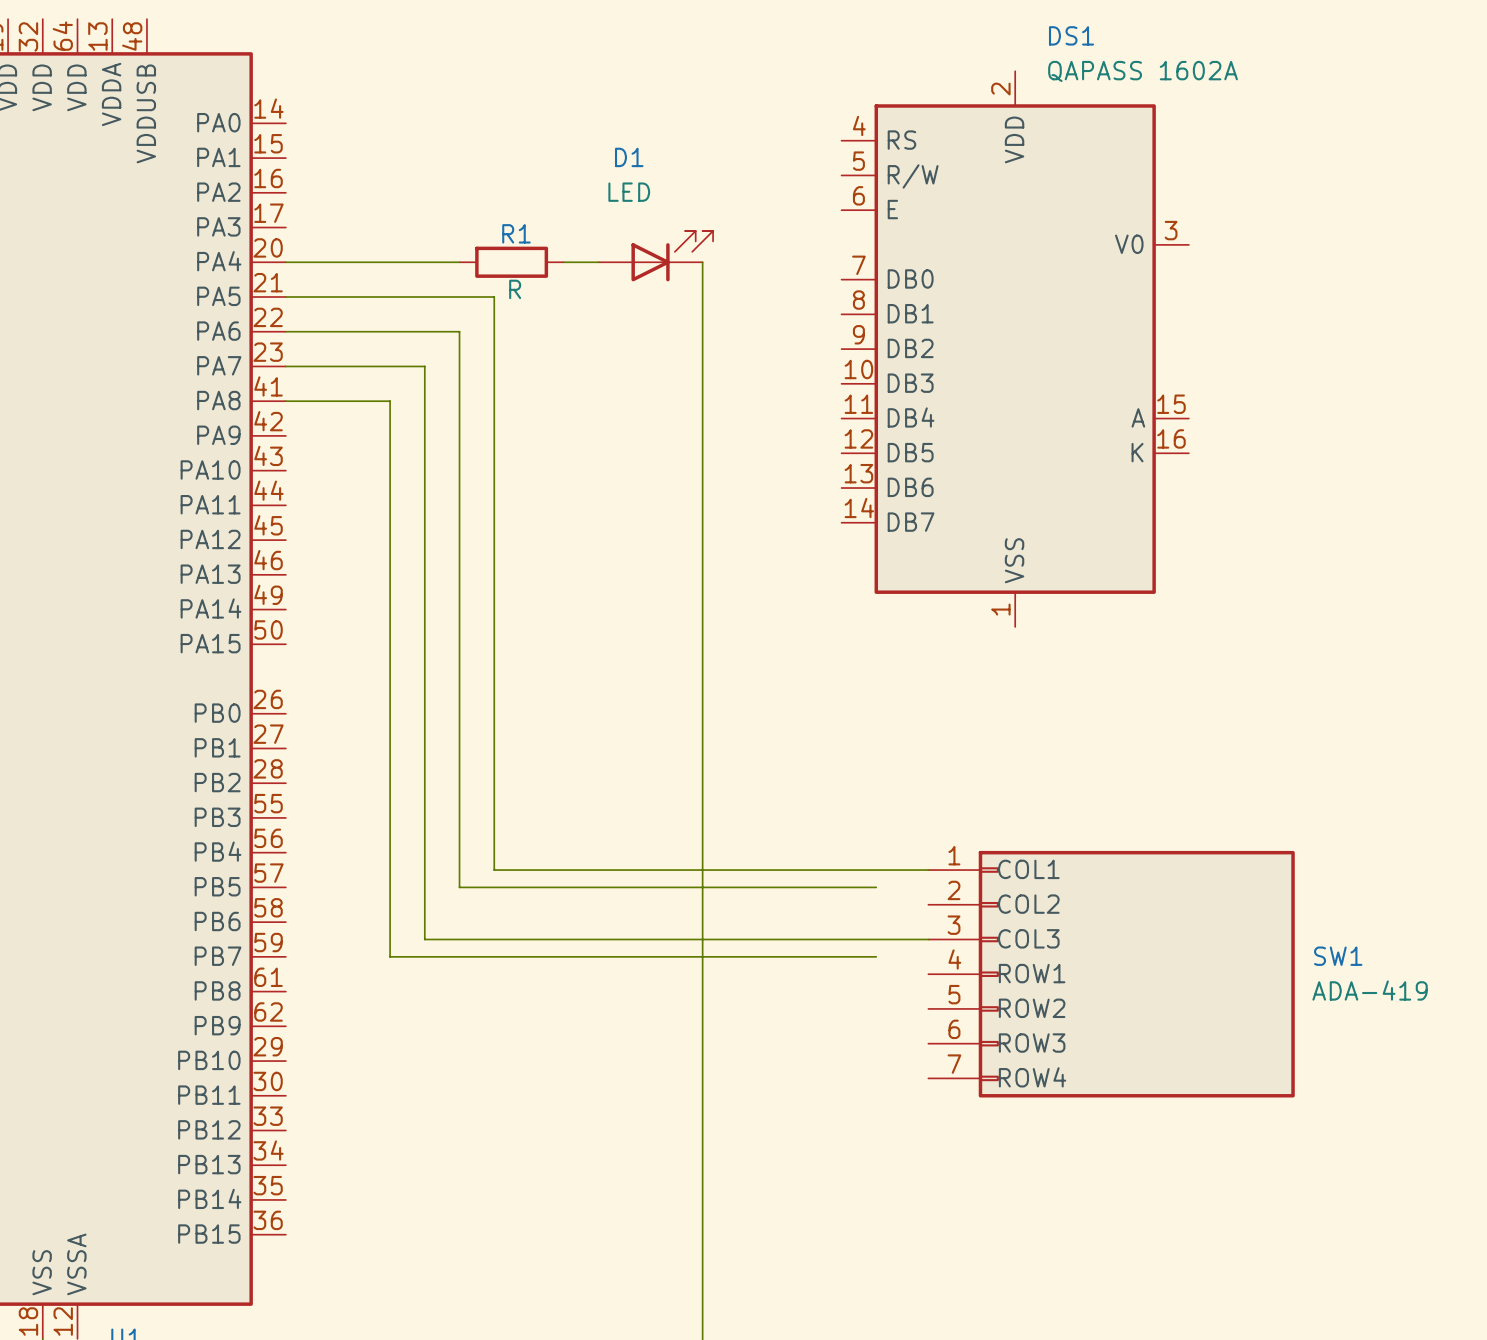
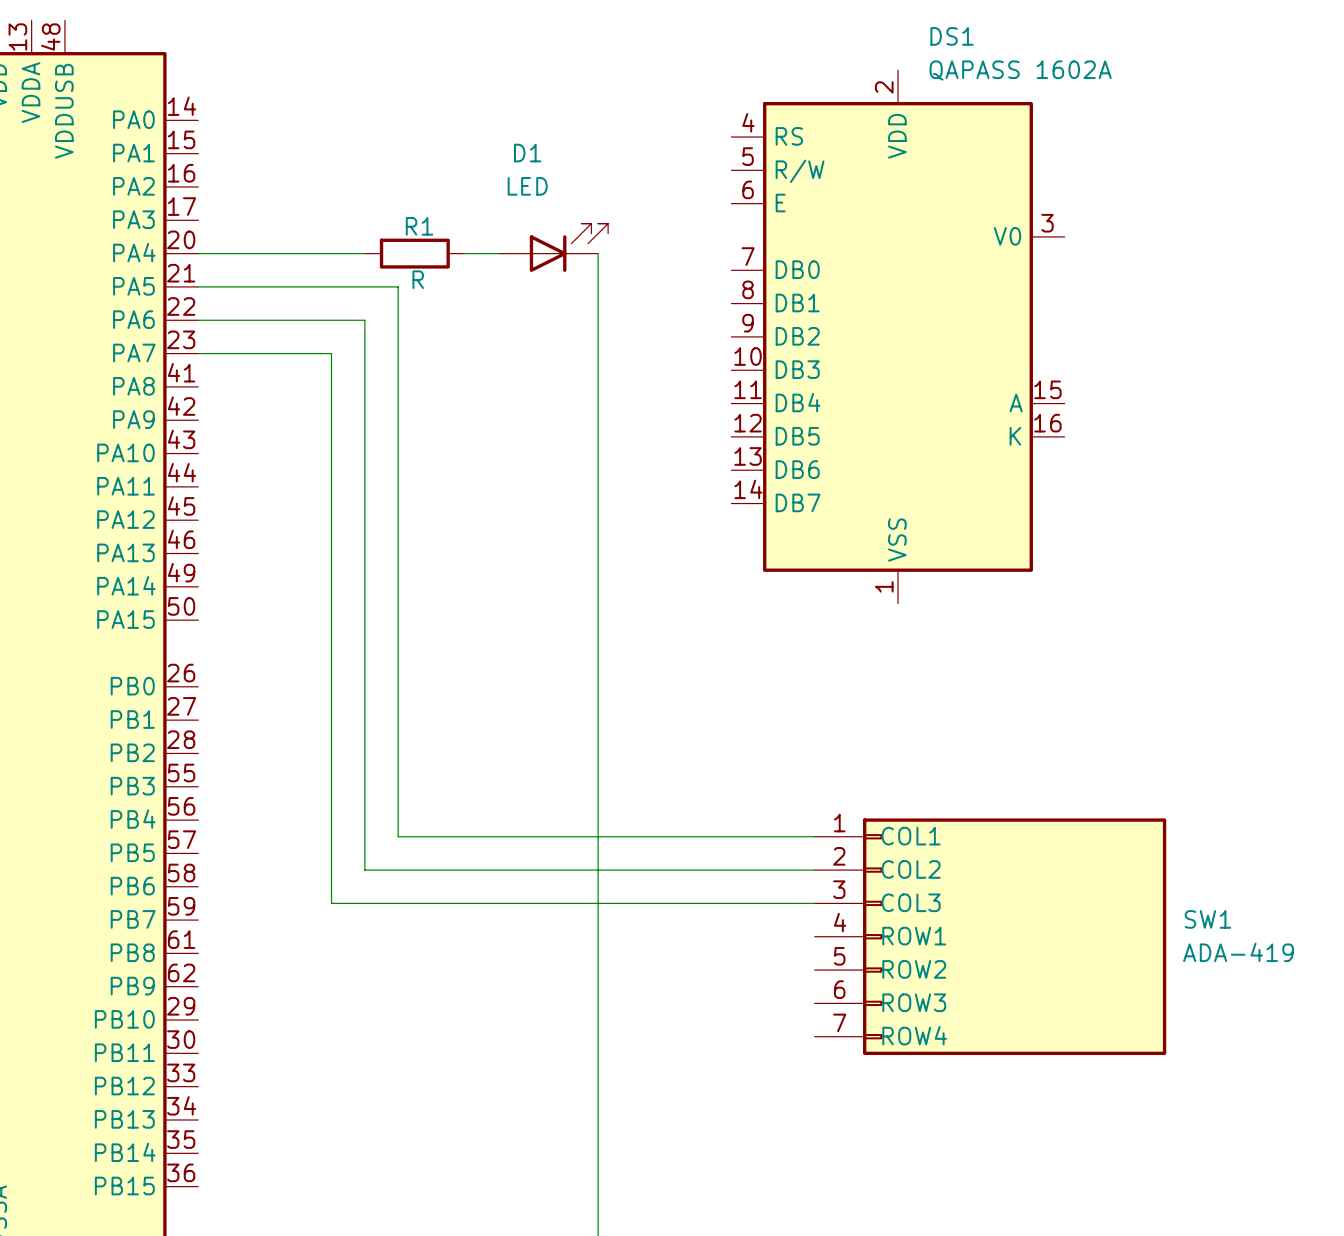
wire: (285, 401) (390, 401) (390, 956) (876, 956) -> none
wire: (459, 887) (876, 887) -> (364, 853) (364, 870) (814, 870)

